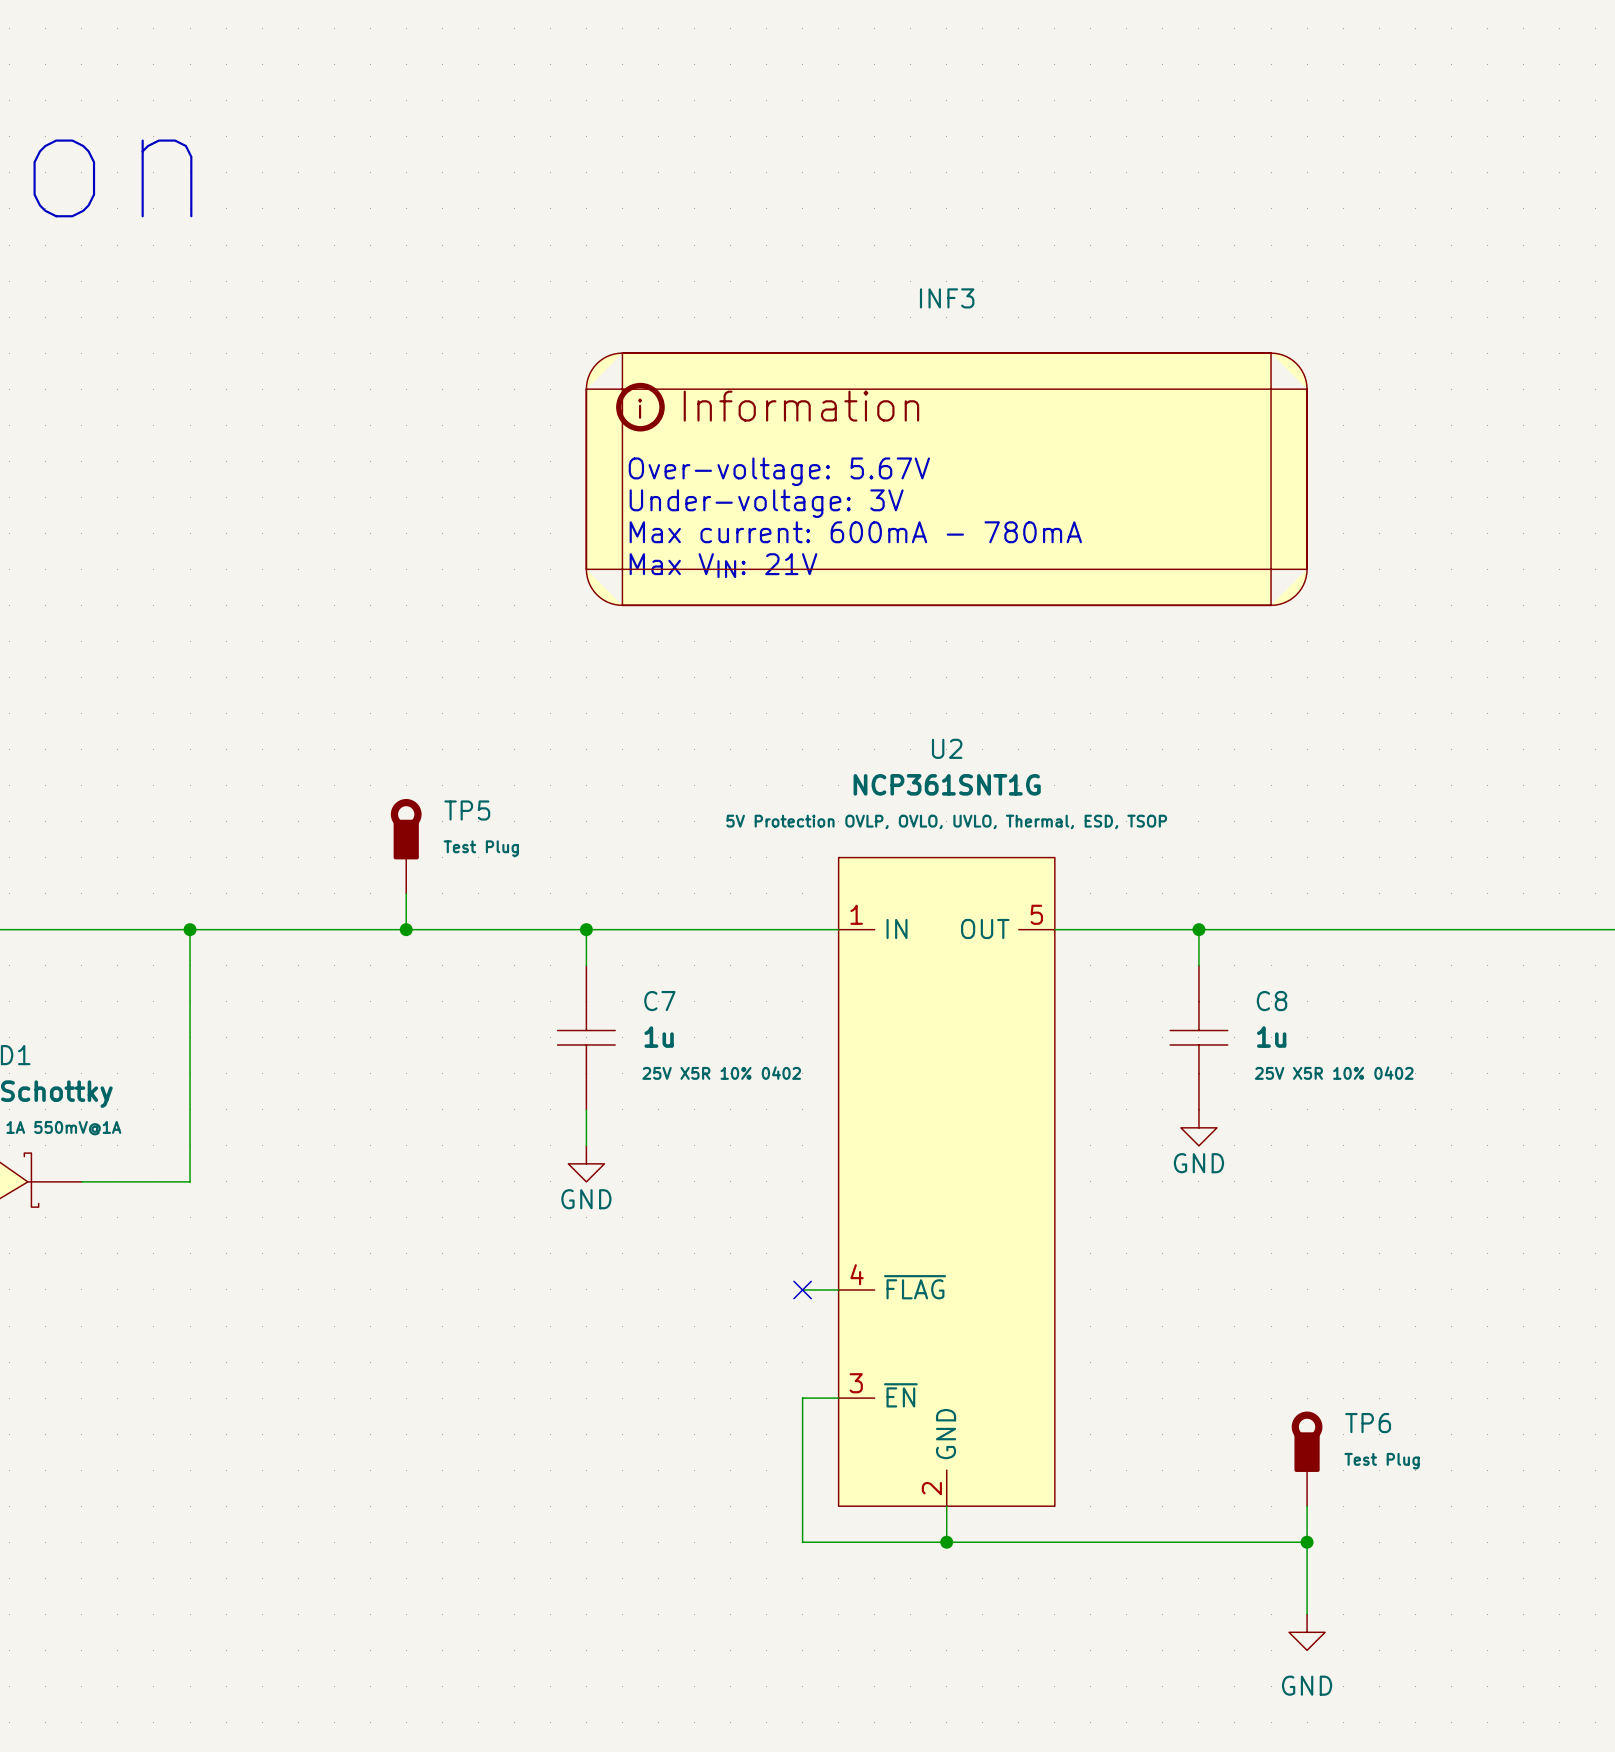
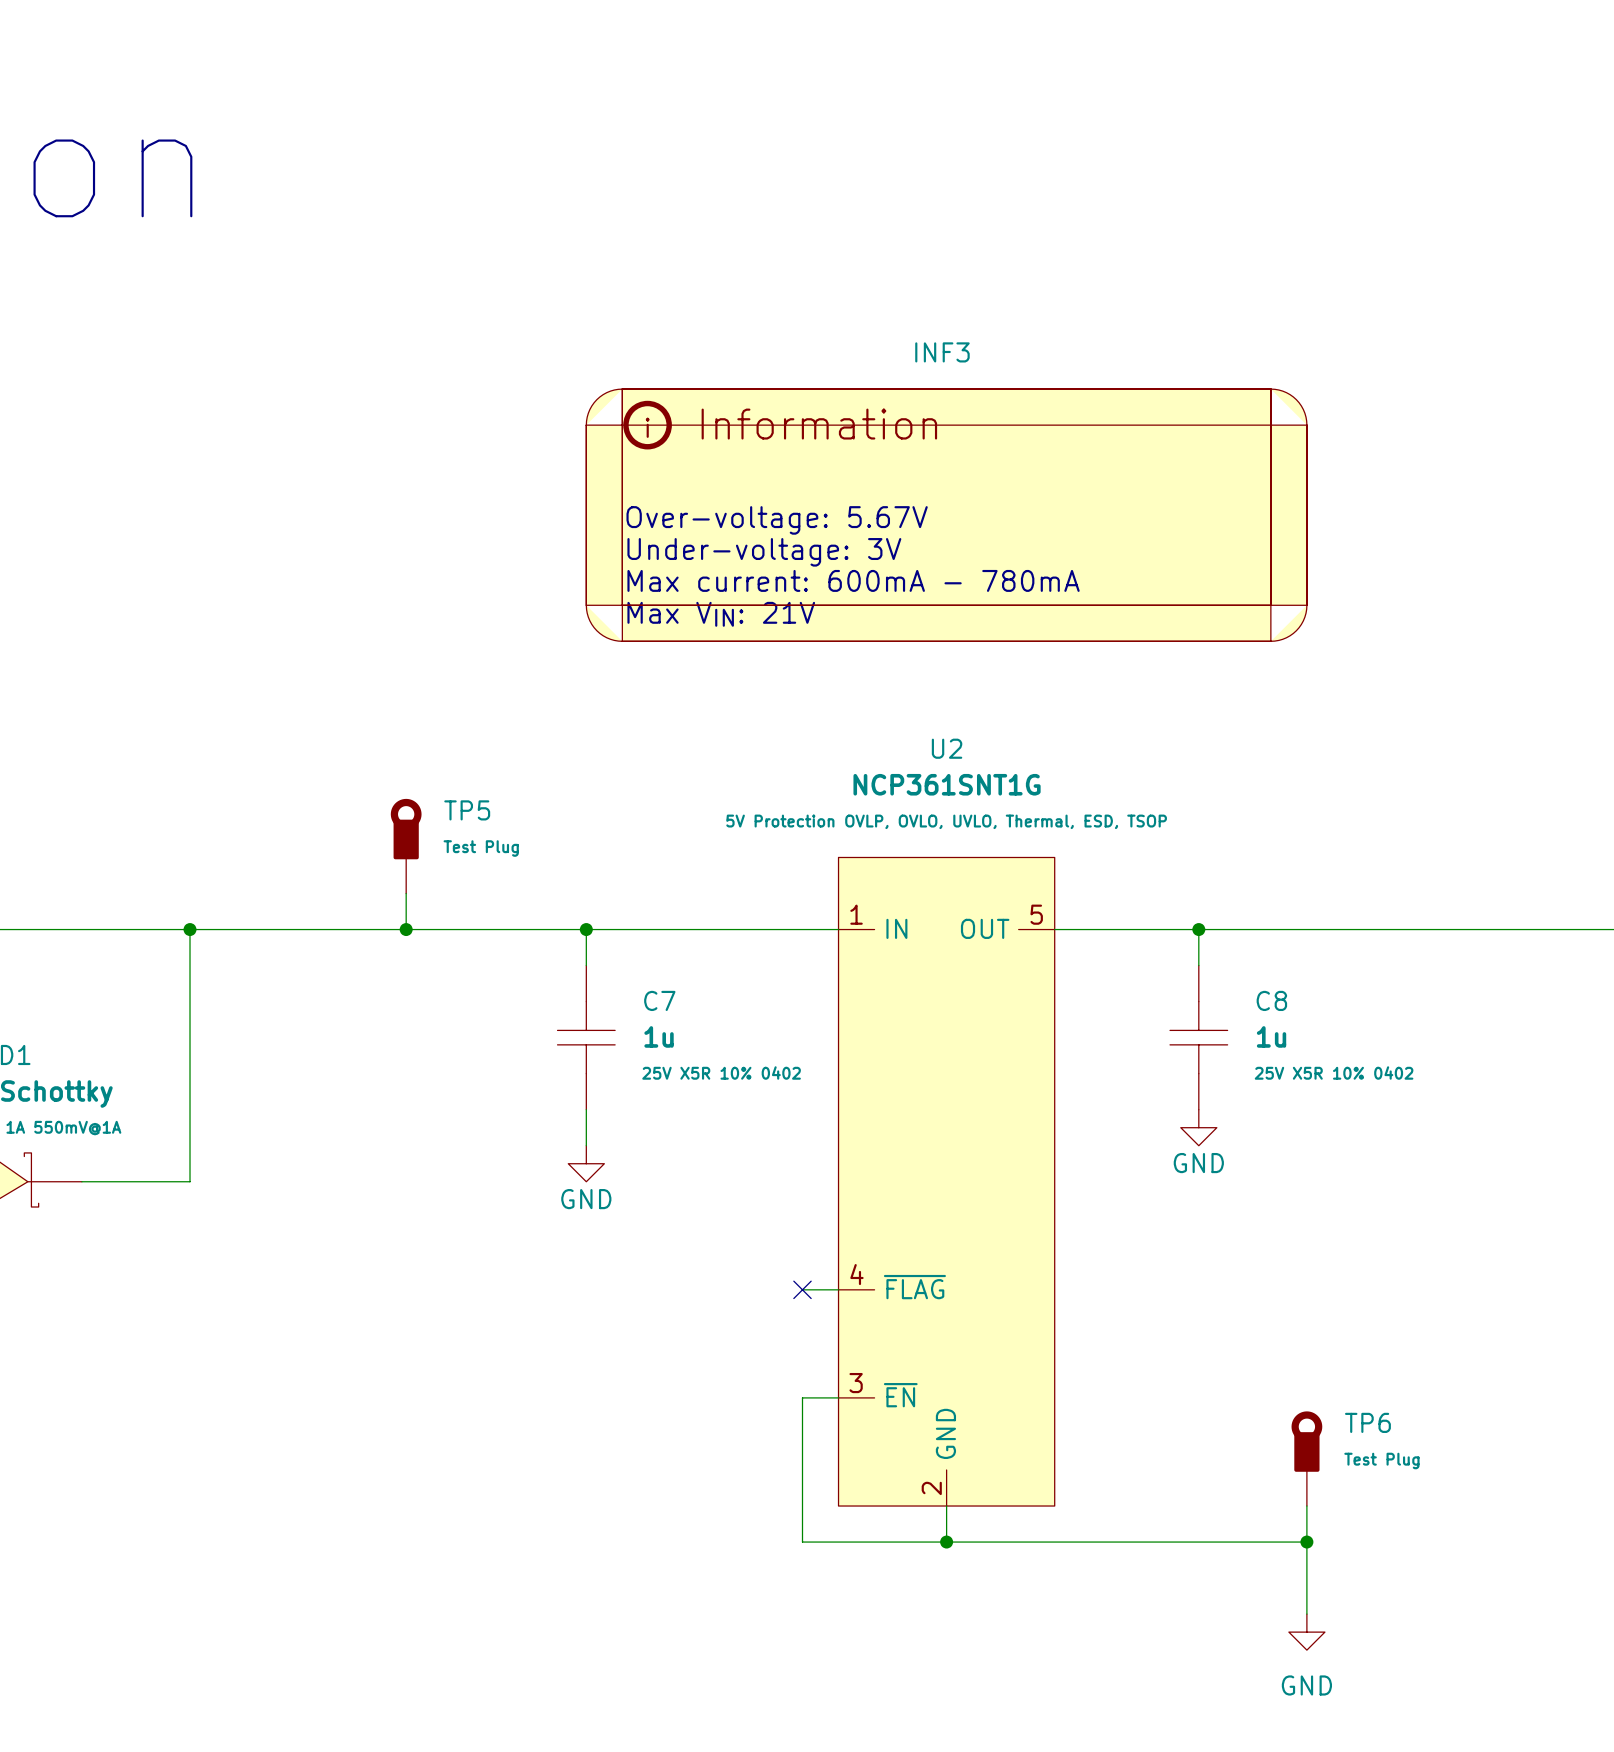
INF3 symbol: [586, 353, 1308, 606] -> [586, 389, 1307, 642]
text position: Over-voltage: 5.67V (779, 471) -> Over-voltage: 5.67V (777, 520)
text position: Under-voltage: 3V (766, 503) -> Under-voltage: 3V (764, 552)
text position: Max current: 600mA - 780mA (855, 532) -> Max current: 600mA - 780mA (853, 580)
text position: Max VIN: 21V (723, 565) -> Max VIN: 21V (721, 614)

